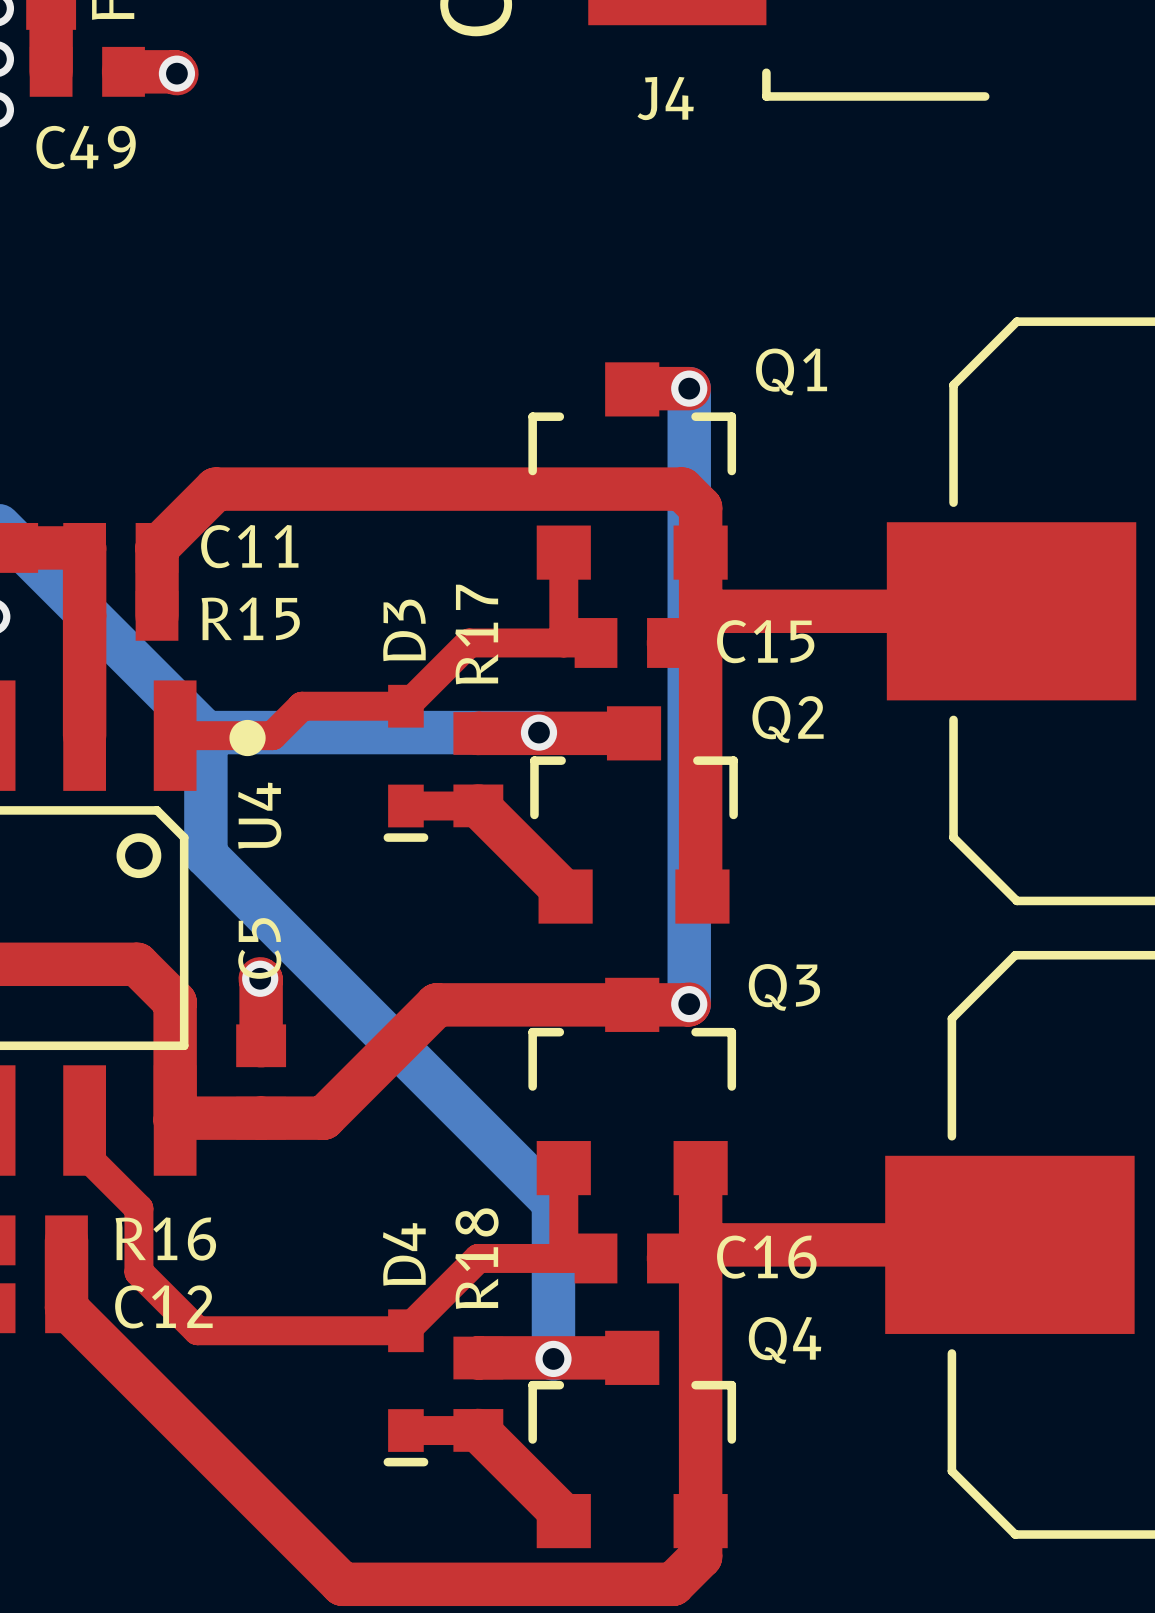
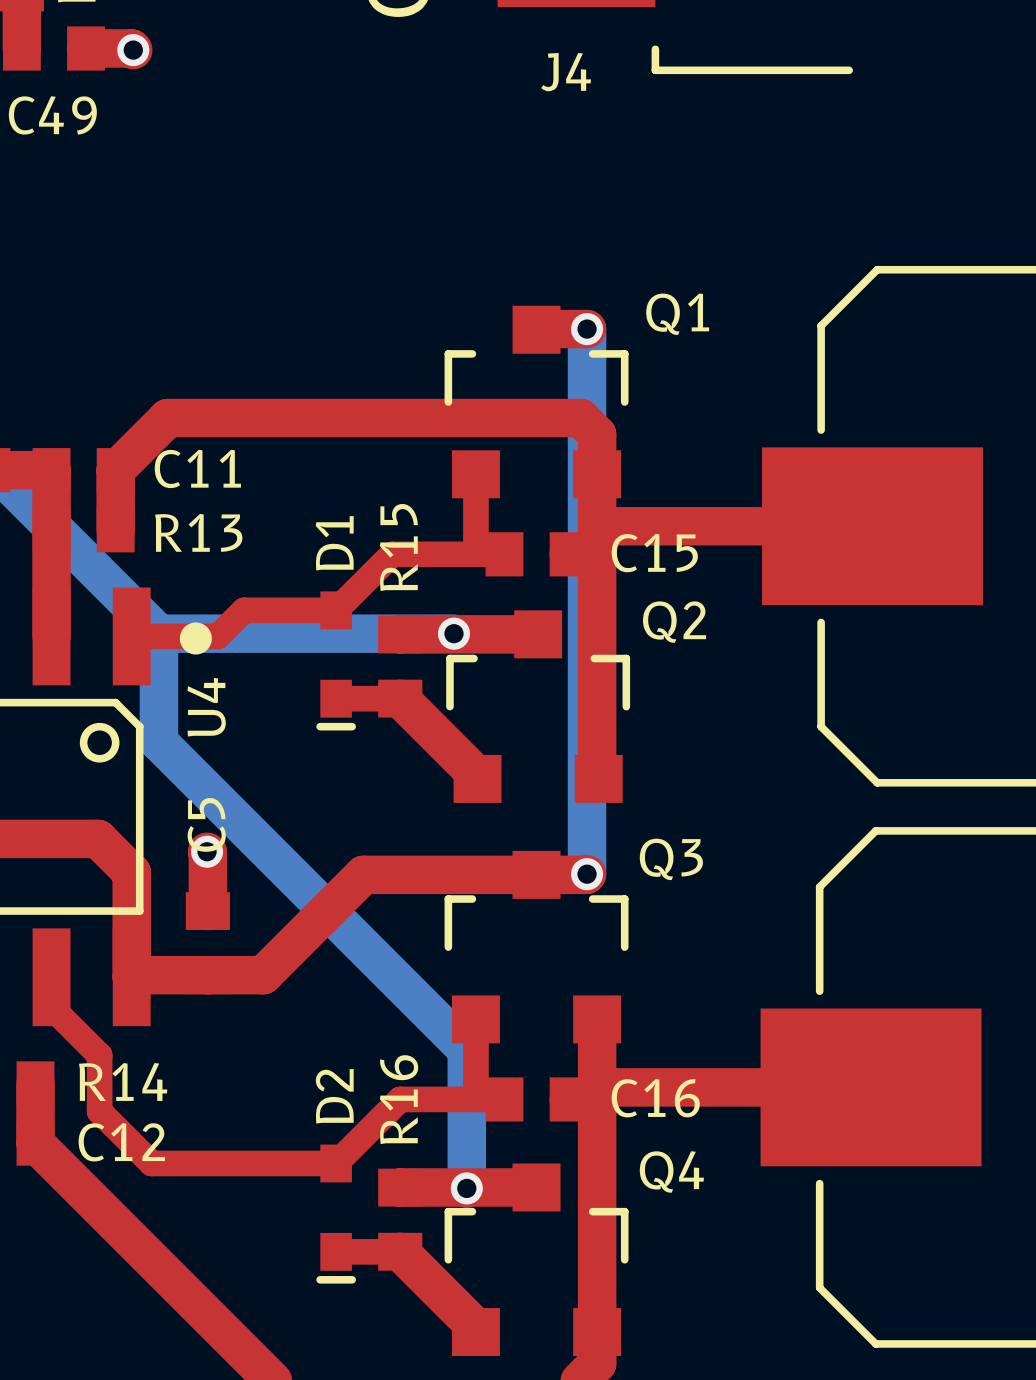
R15 name: R15 (250, 618) -> R13 (198, 532)
D3 name: D3 (404, 630) -> D1 (334, 543)
R17 name: R17 (476, 634) -> R15 (398, 547)
R16 name: R16 (165, 1238) -> R14 (123, 1081)
D4 name: D4 (404, 1254) -> D2 (334, 1096)
R18 name: R18 (476, 1258) -> R16 (399, 1099)

